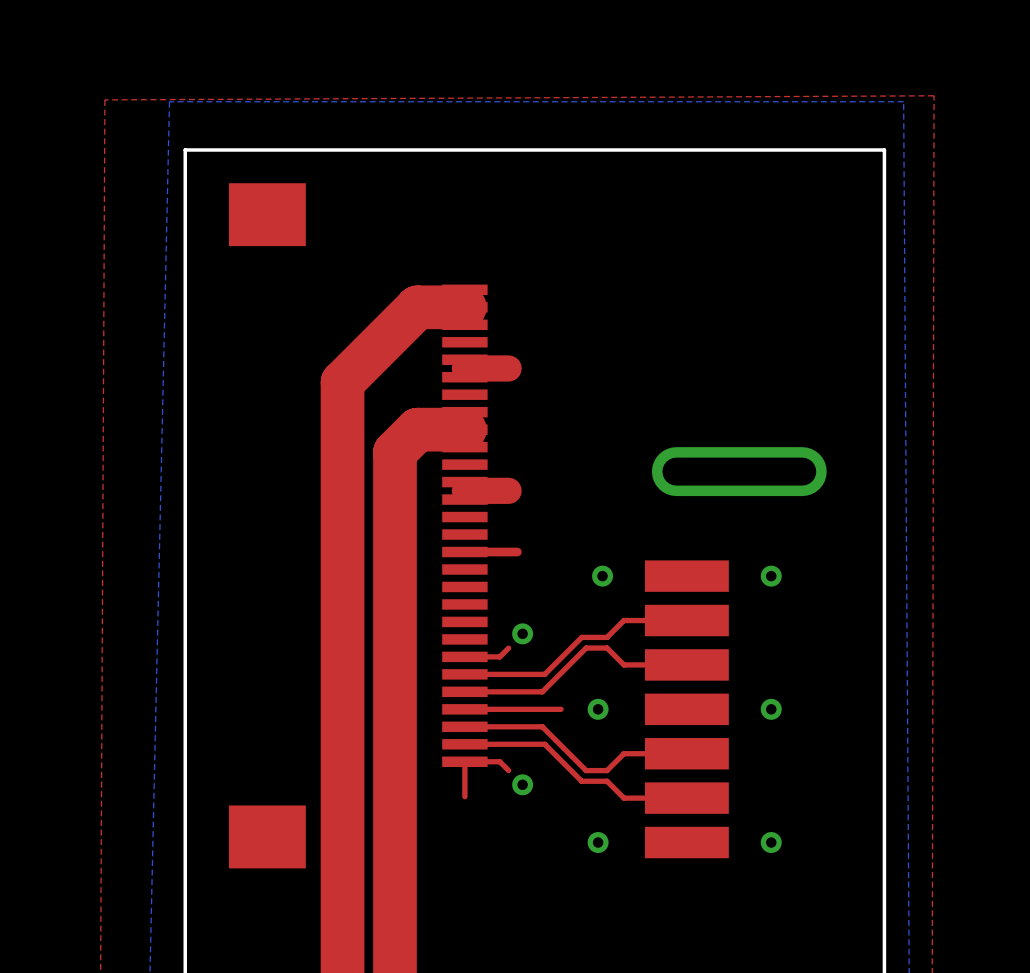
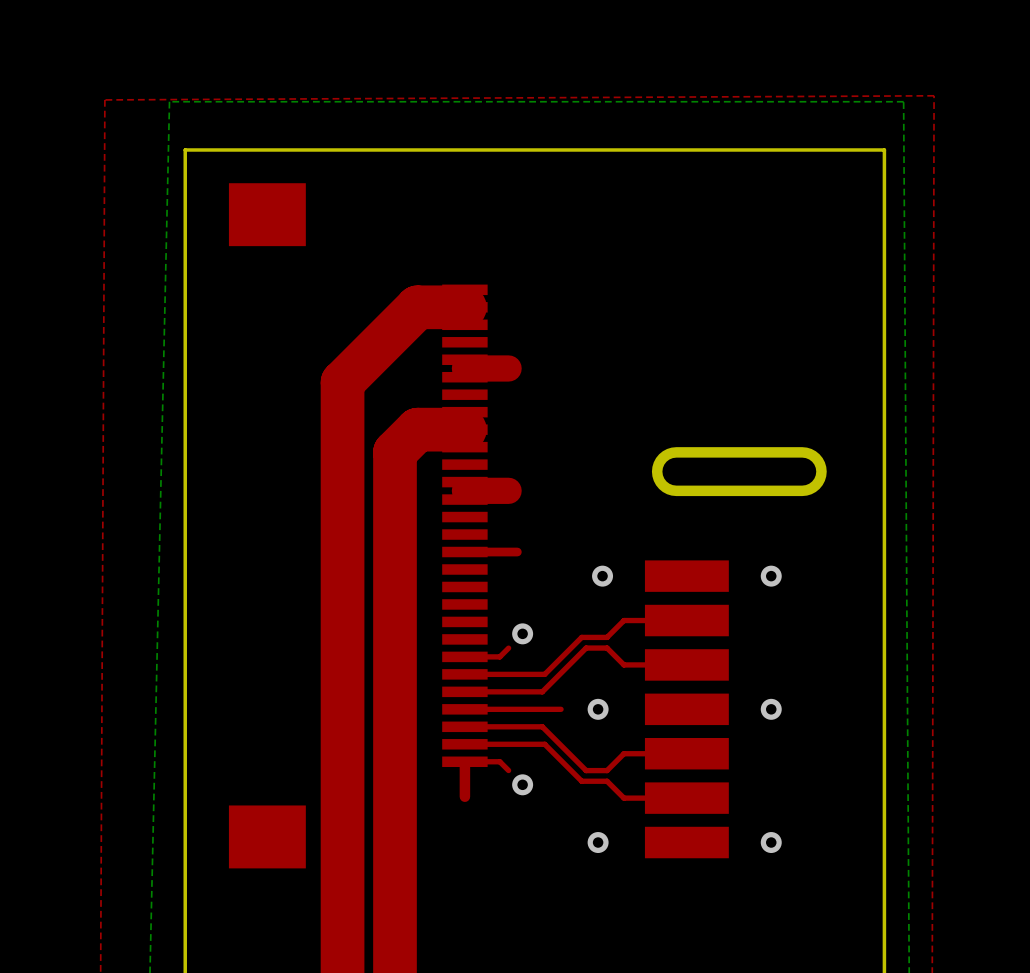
top track width: thin (464, 765) (464, 796) -> thick (464, 765) (464, 796)

